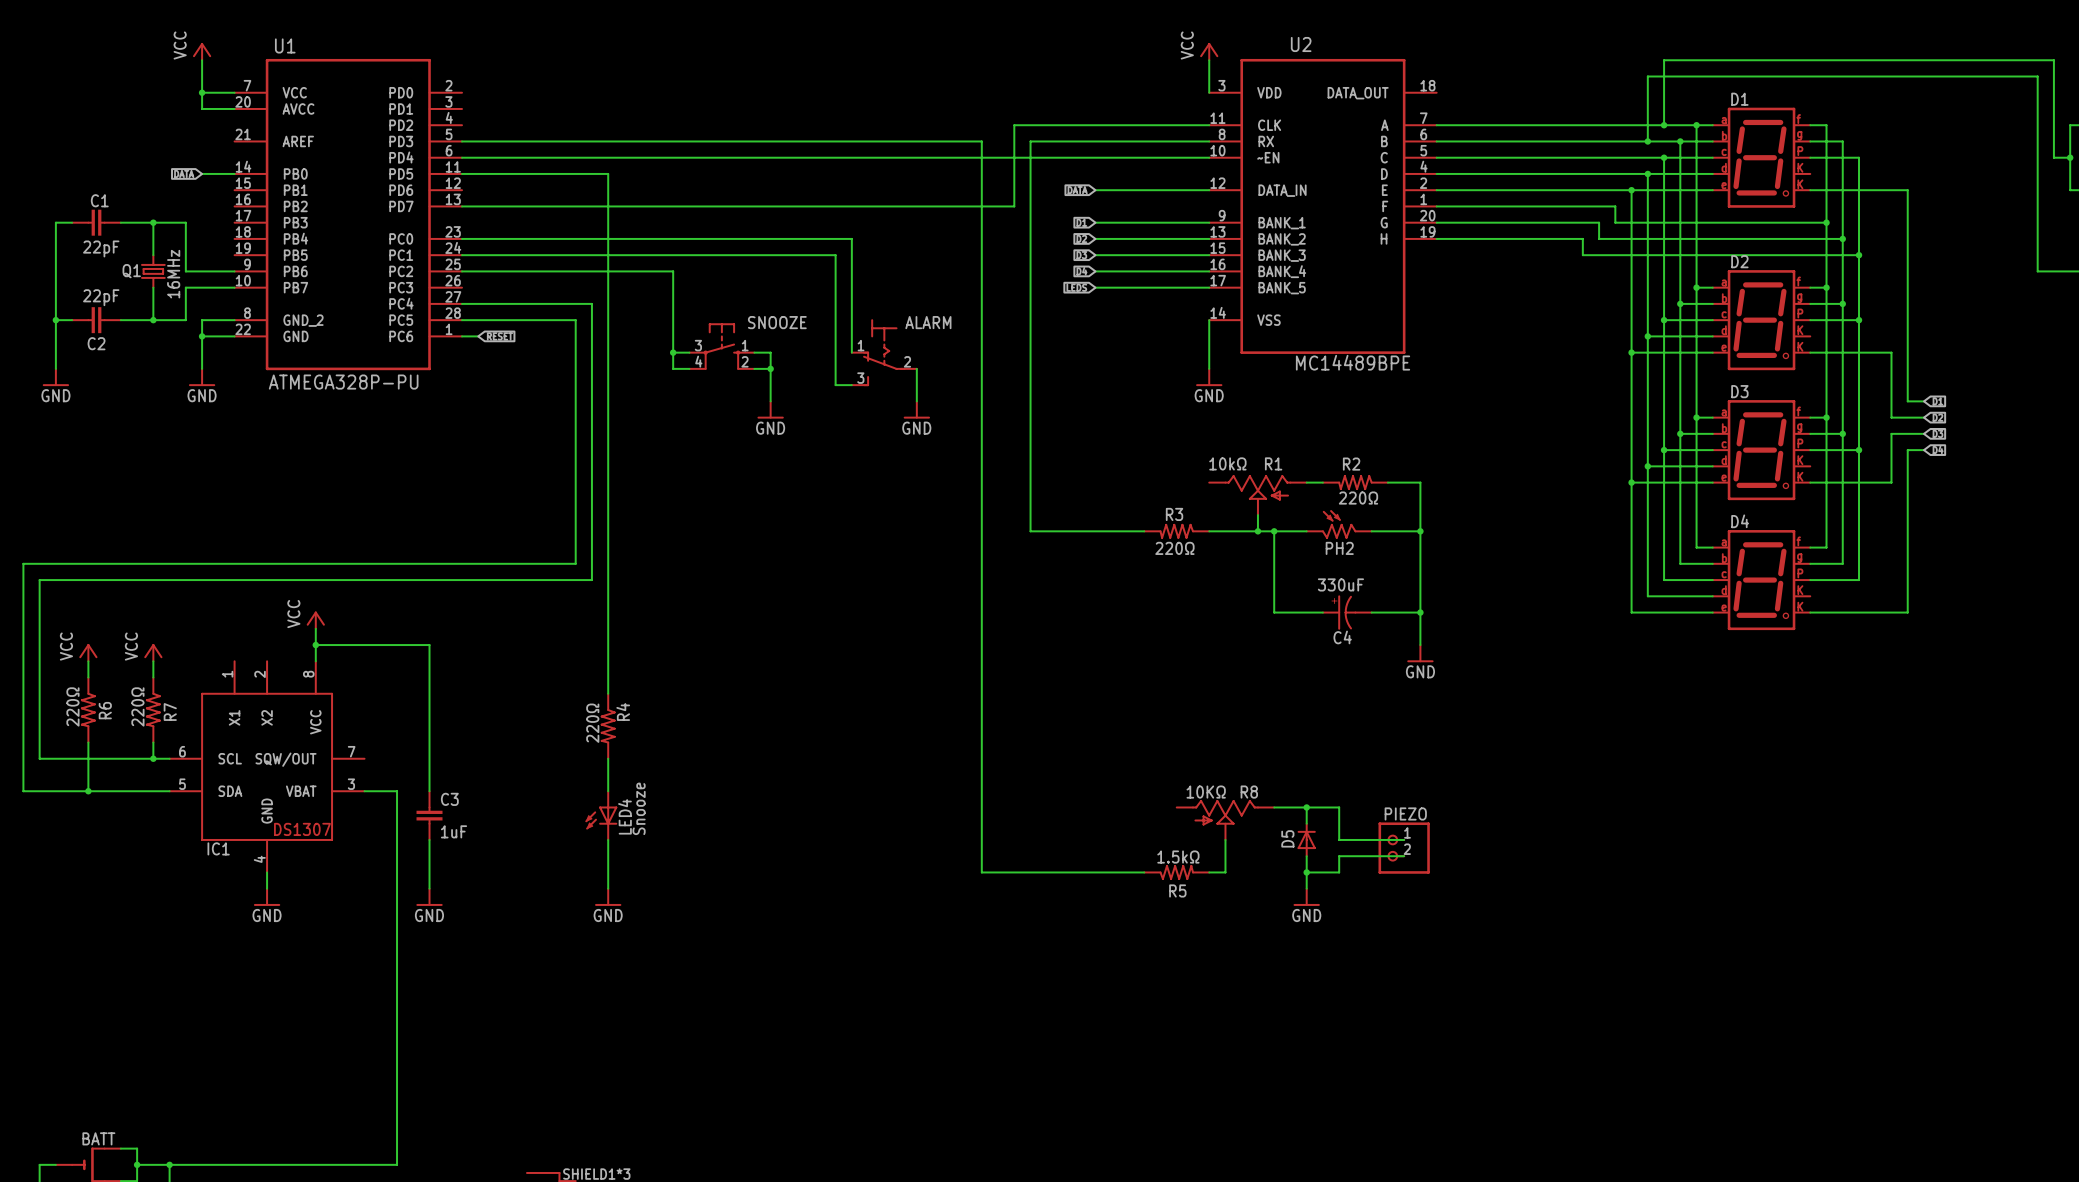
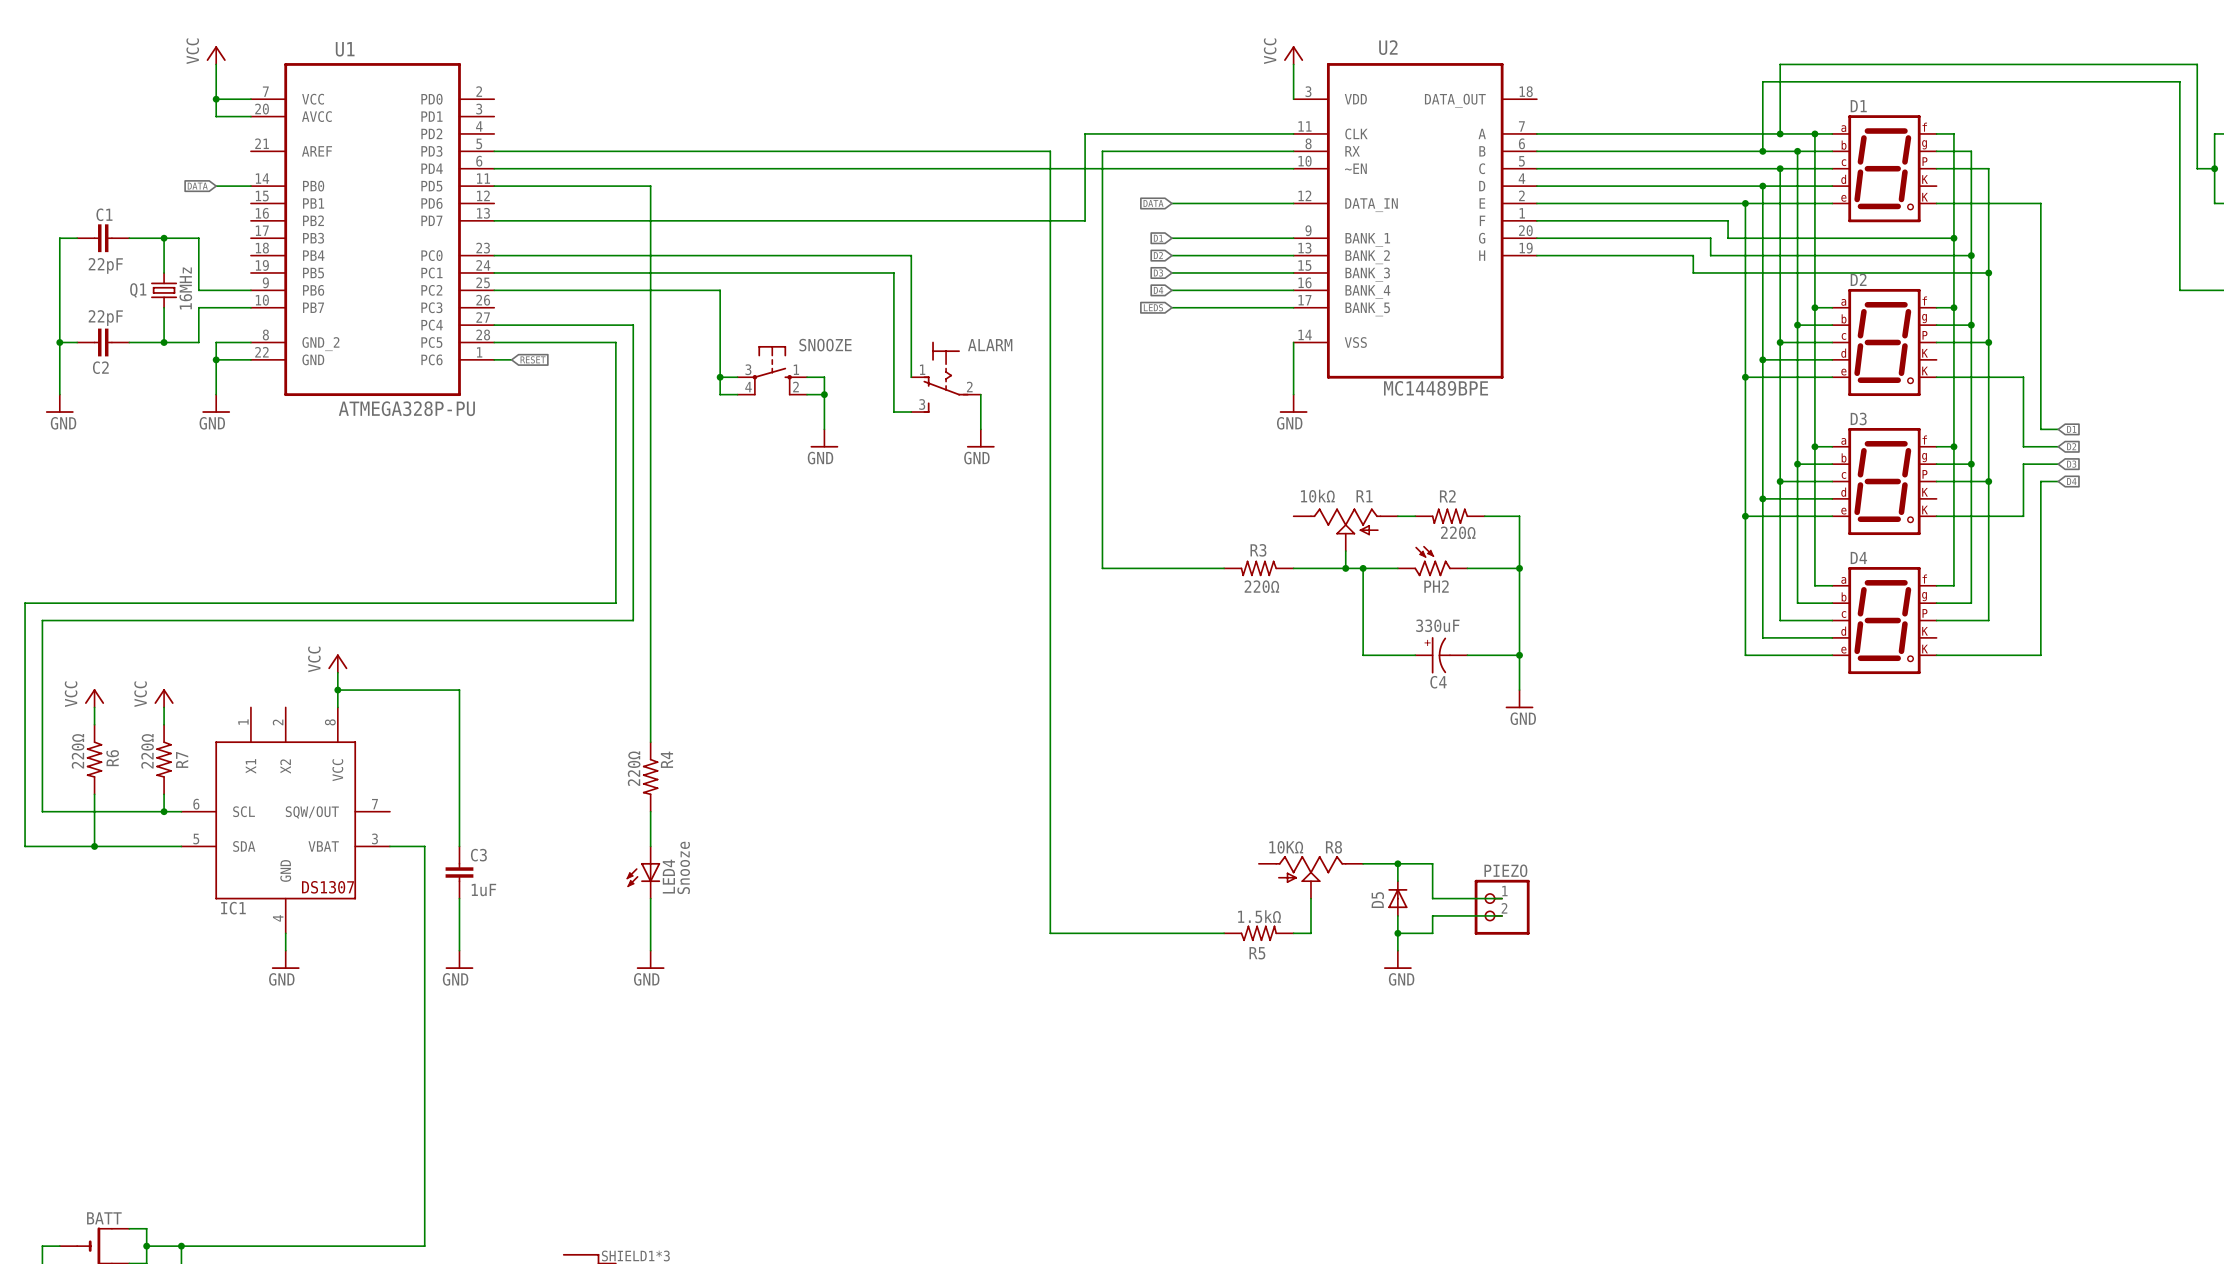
U1 name position: U1 (285, 45) -> U1 (345, 49)
U1 value position: ATMEGA328P-PU (343, 382) -> ATMEGA328P-PU (406, 408)

